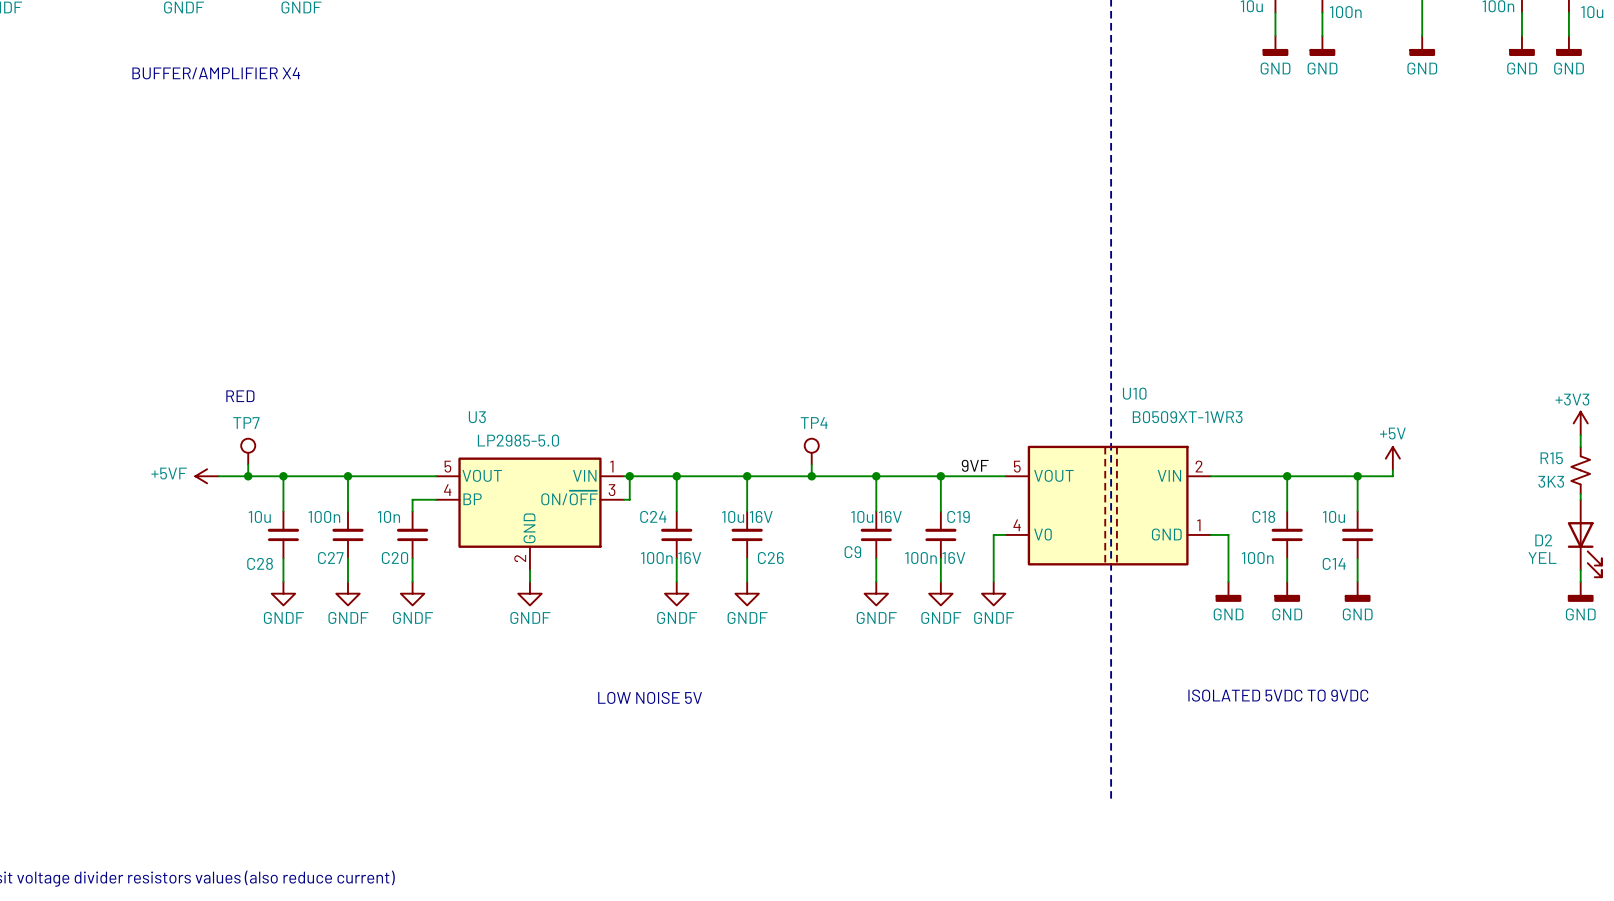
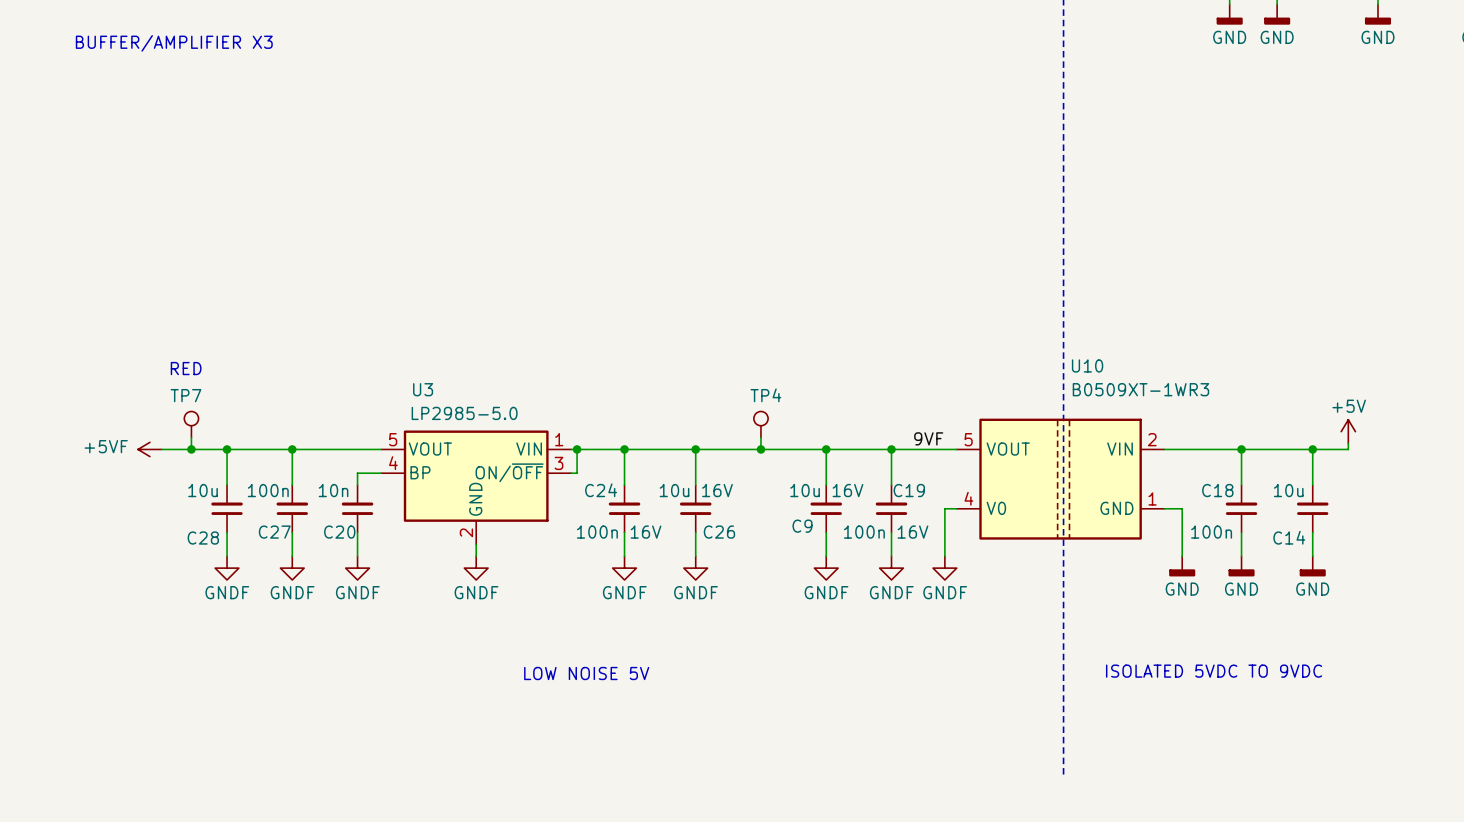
text: BUFFER/AMPLIFIER X4 (216, 73) -> BUFFER/AMPLIFIER X3 (174, 43)

